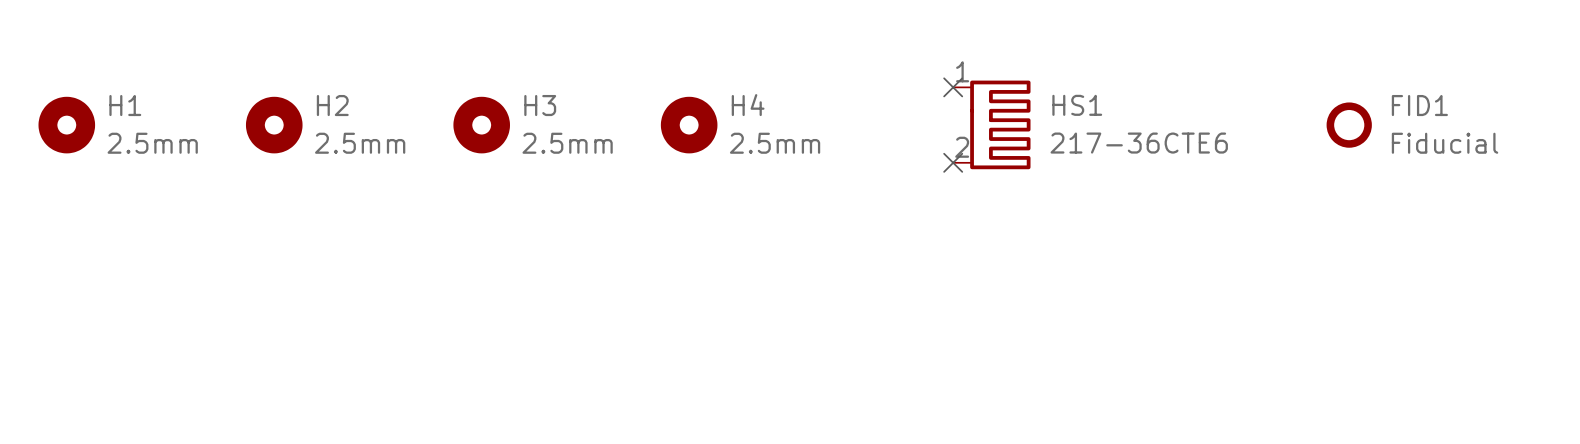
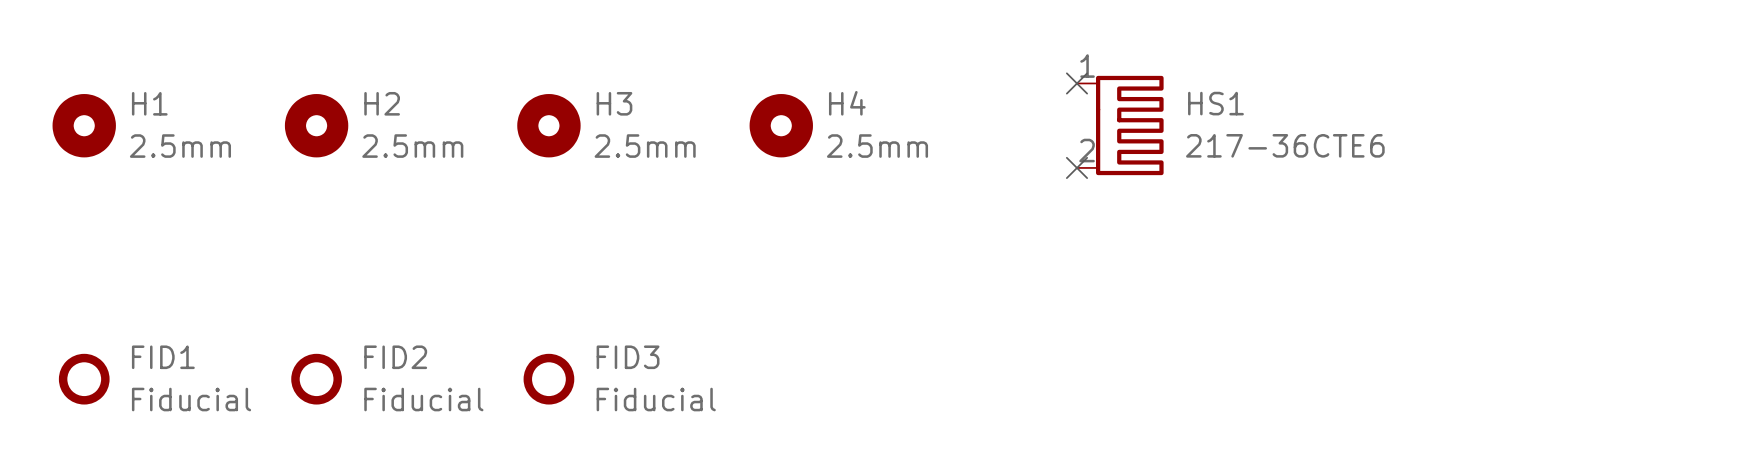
FID1 position: (1349, 125) -> (84, 379)
FID2: none -> Fiducial (316, 379)
FID3: none -> Fiducial (548, 379)

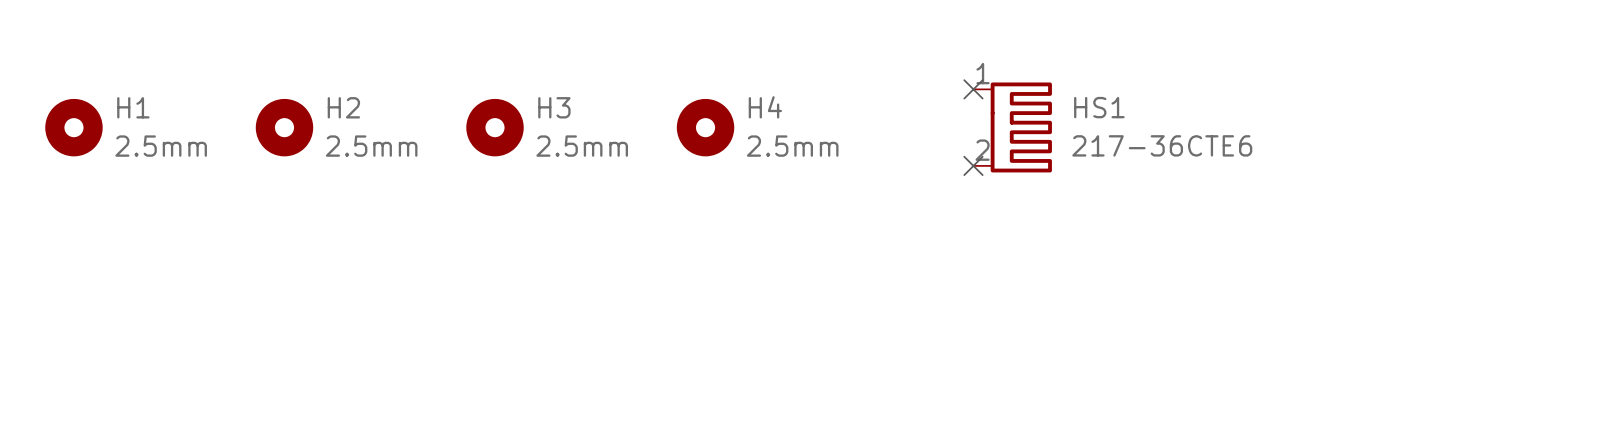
FID1: Fiducial (84, 379) -> none
FID2: Fiducial (316, 379) -> none
FID3: Fiducial (548, 379) -> none

